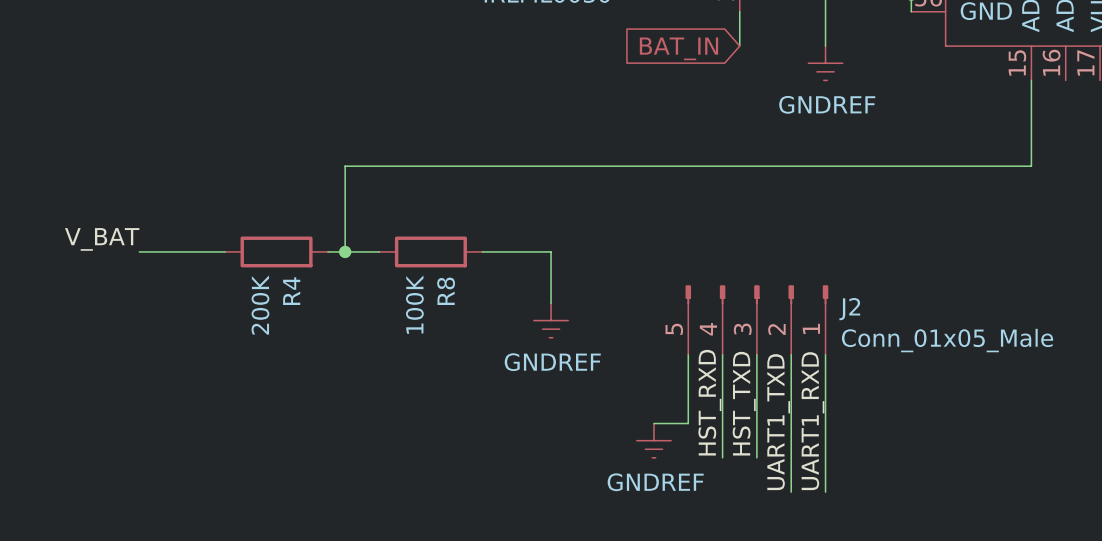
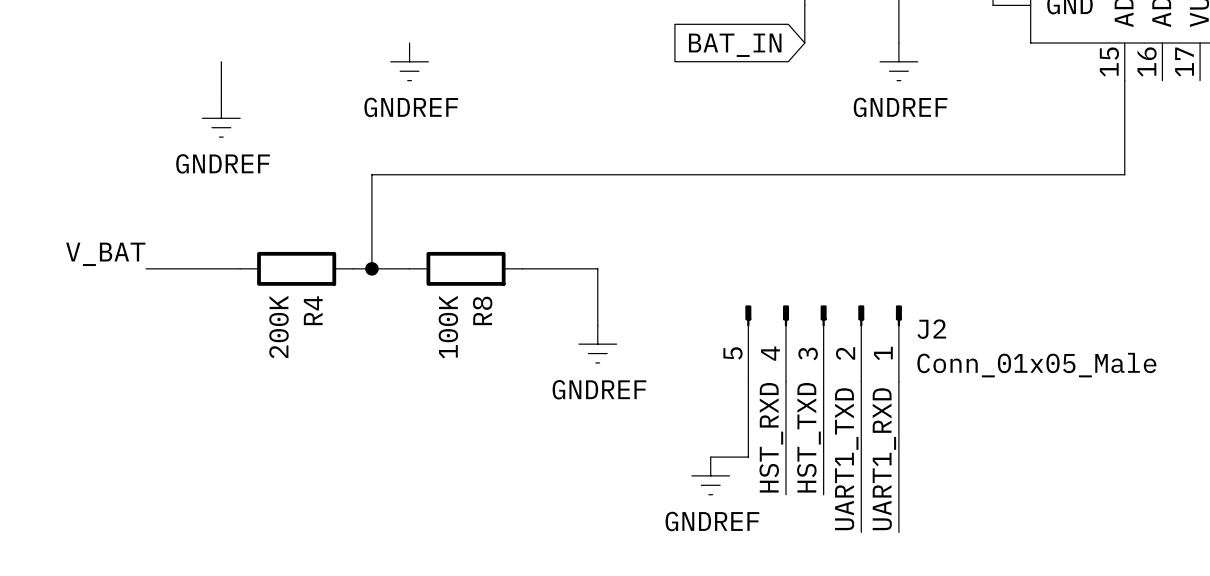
wire: none -> (221, 61) (221, 99)
power symbol: none -> GNDREF (409, 61)
power symbol: none -> GNDREF (221, 118)

